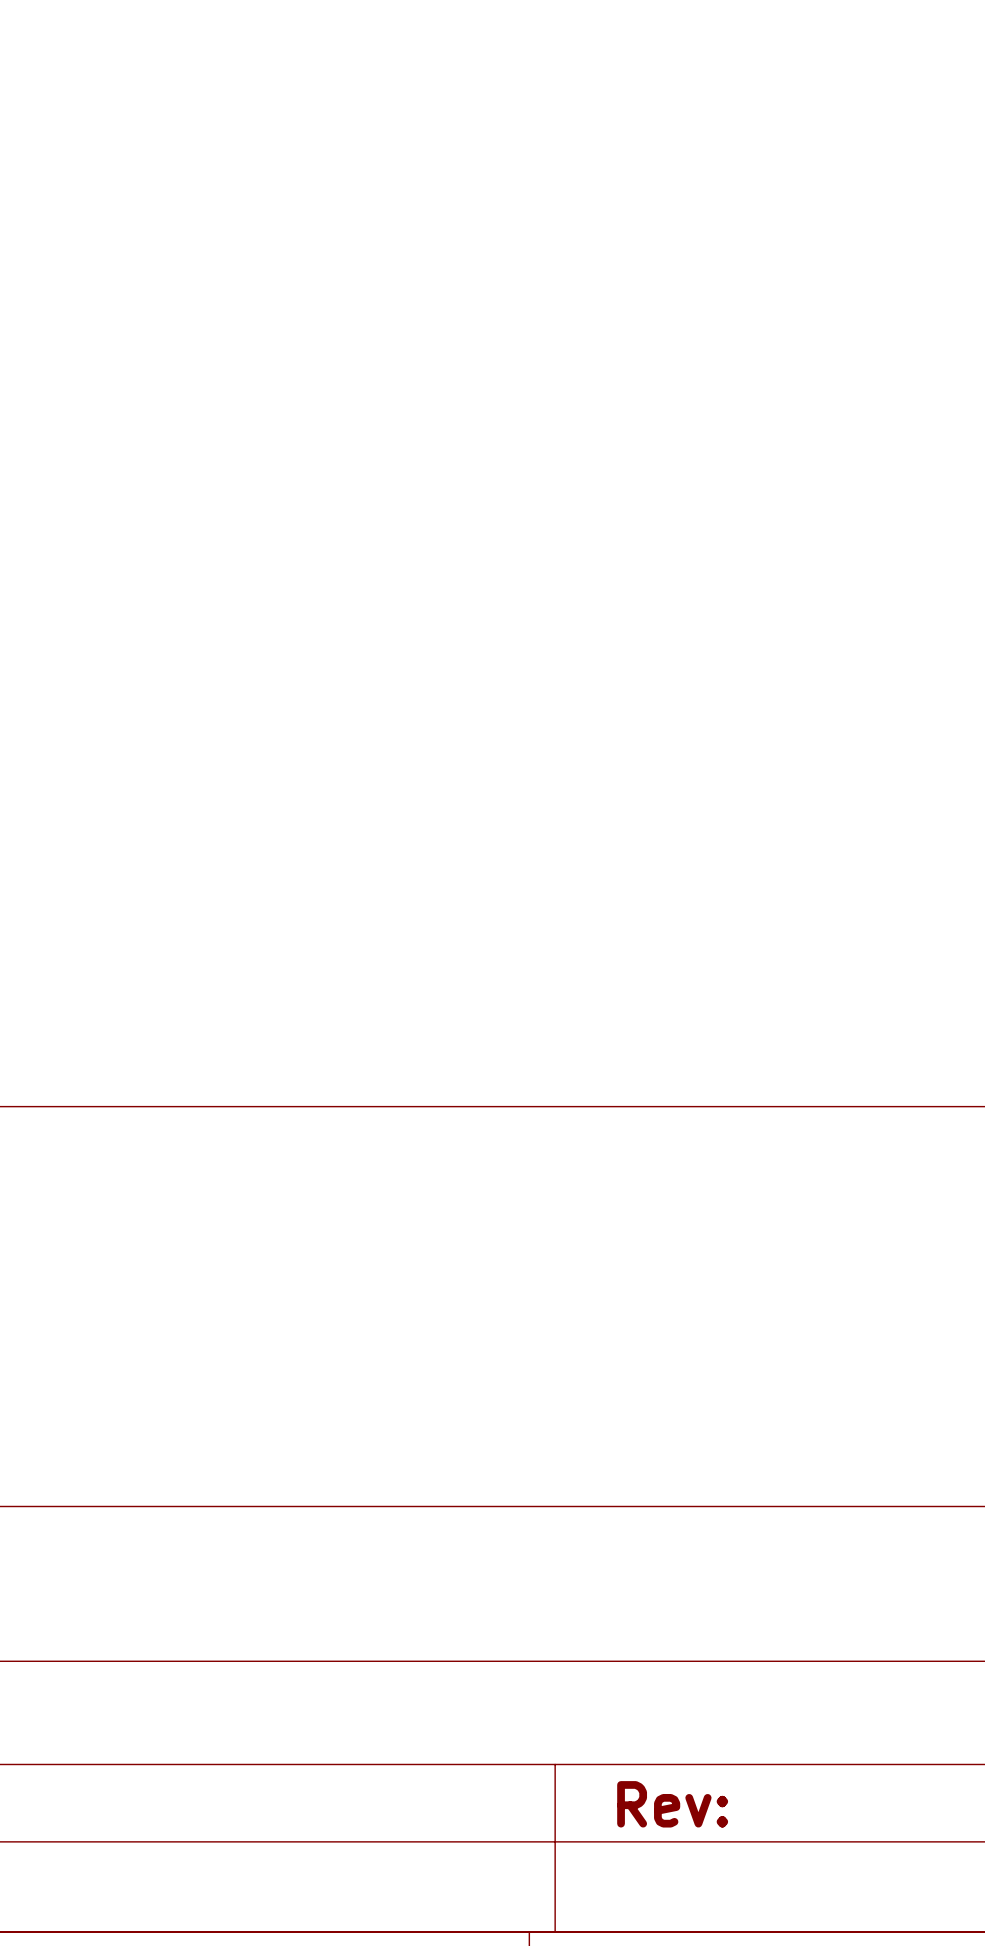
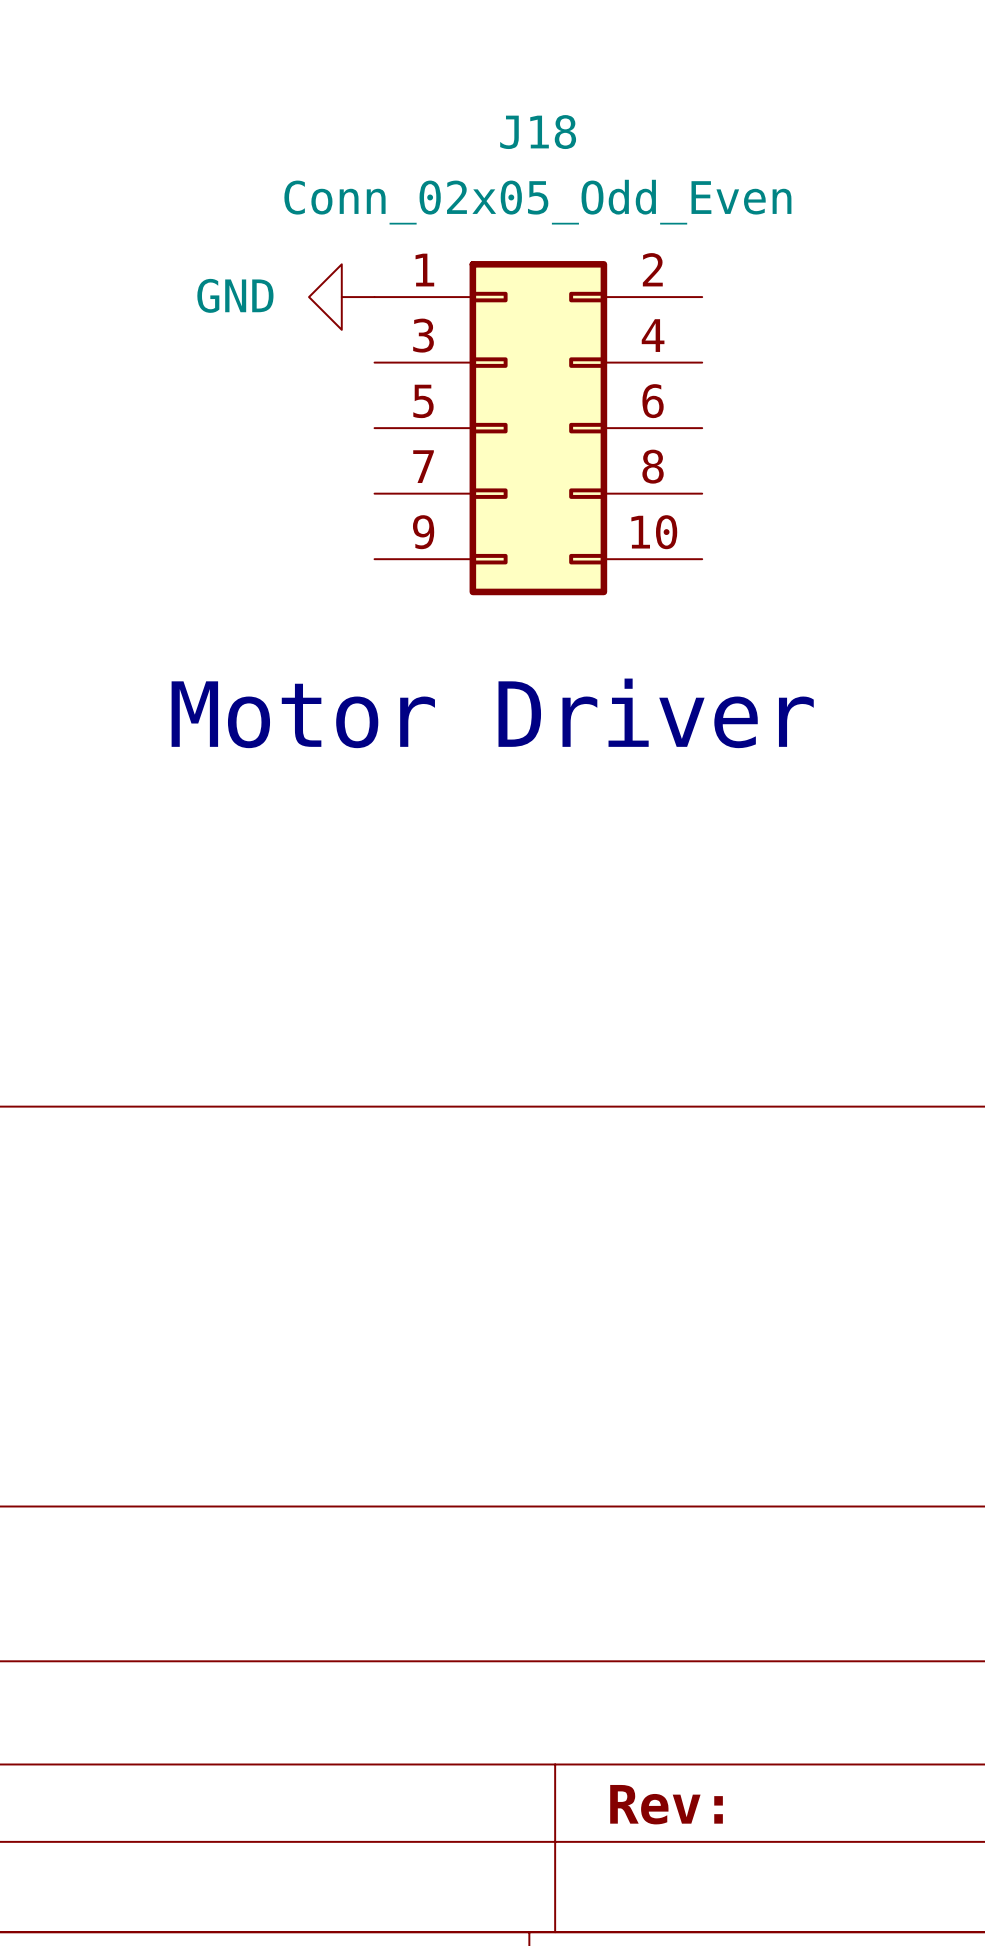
power symbol: none -> GND (341, 297)
J18: none -> Conn_02x05_Odd_Even (538, 428)
text: none -> Motor Driver (492, 713)

